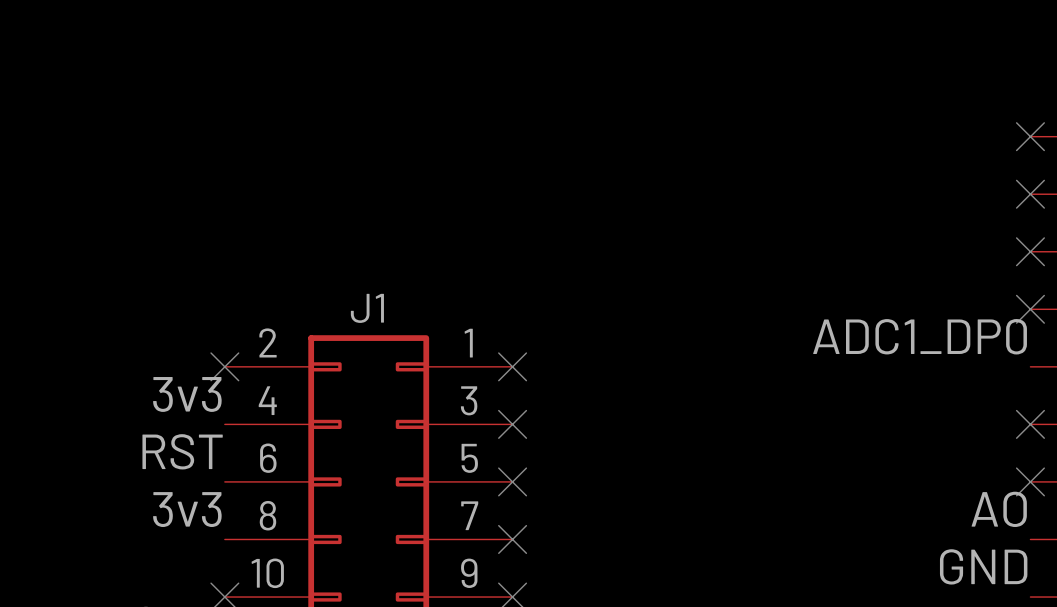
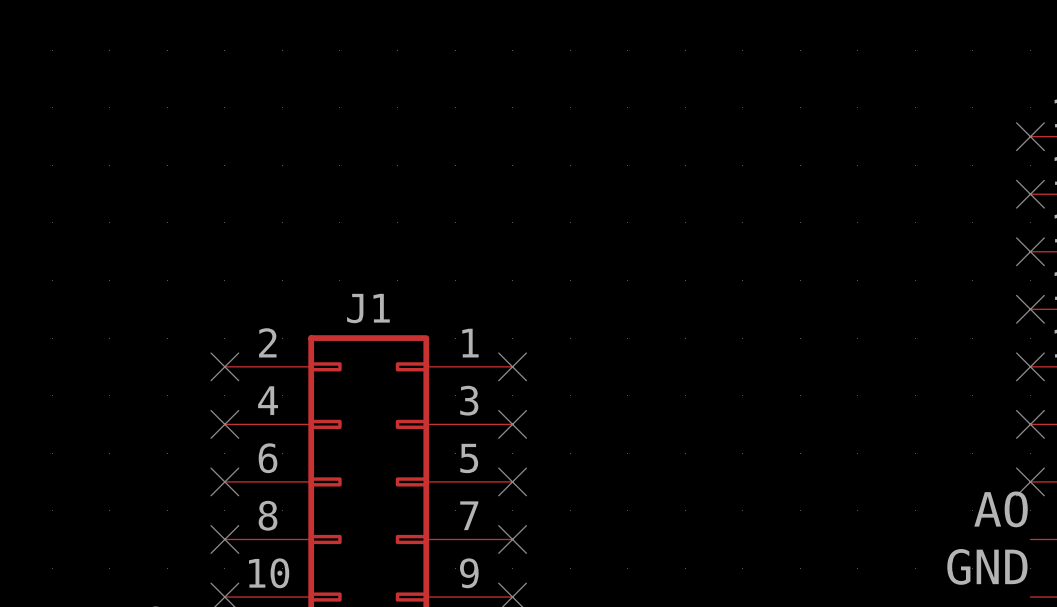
label: ADC1_DP0 (920, 336) -> none
no-connect mark: none -> (1030, 366)
label: 3v3 (187, 394) -> none
no-connect mark: none -> (224, 424)
label: RST (182, 451) -> none
no-connect mark: none -> (224, 481)
label: 3v3 (187, 509) -> none
no-connect mark: none -> (224, 539)

